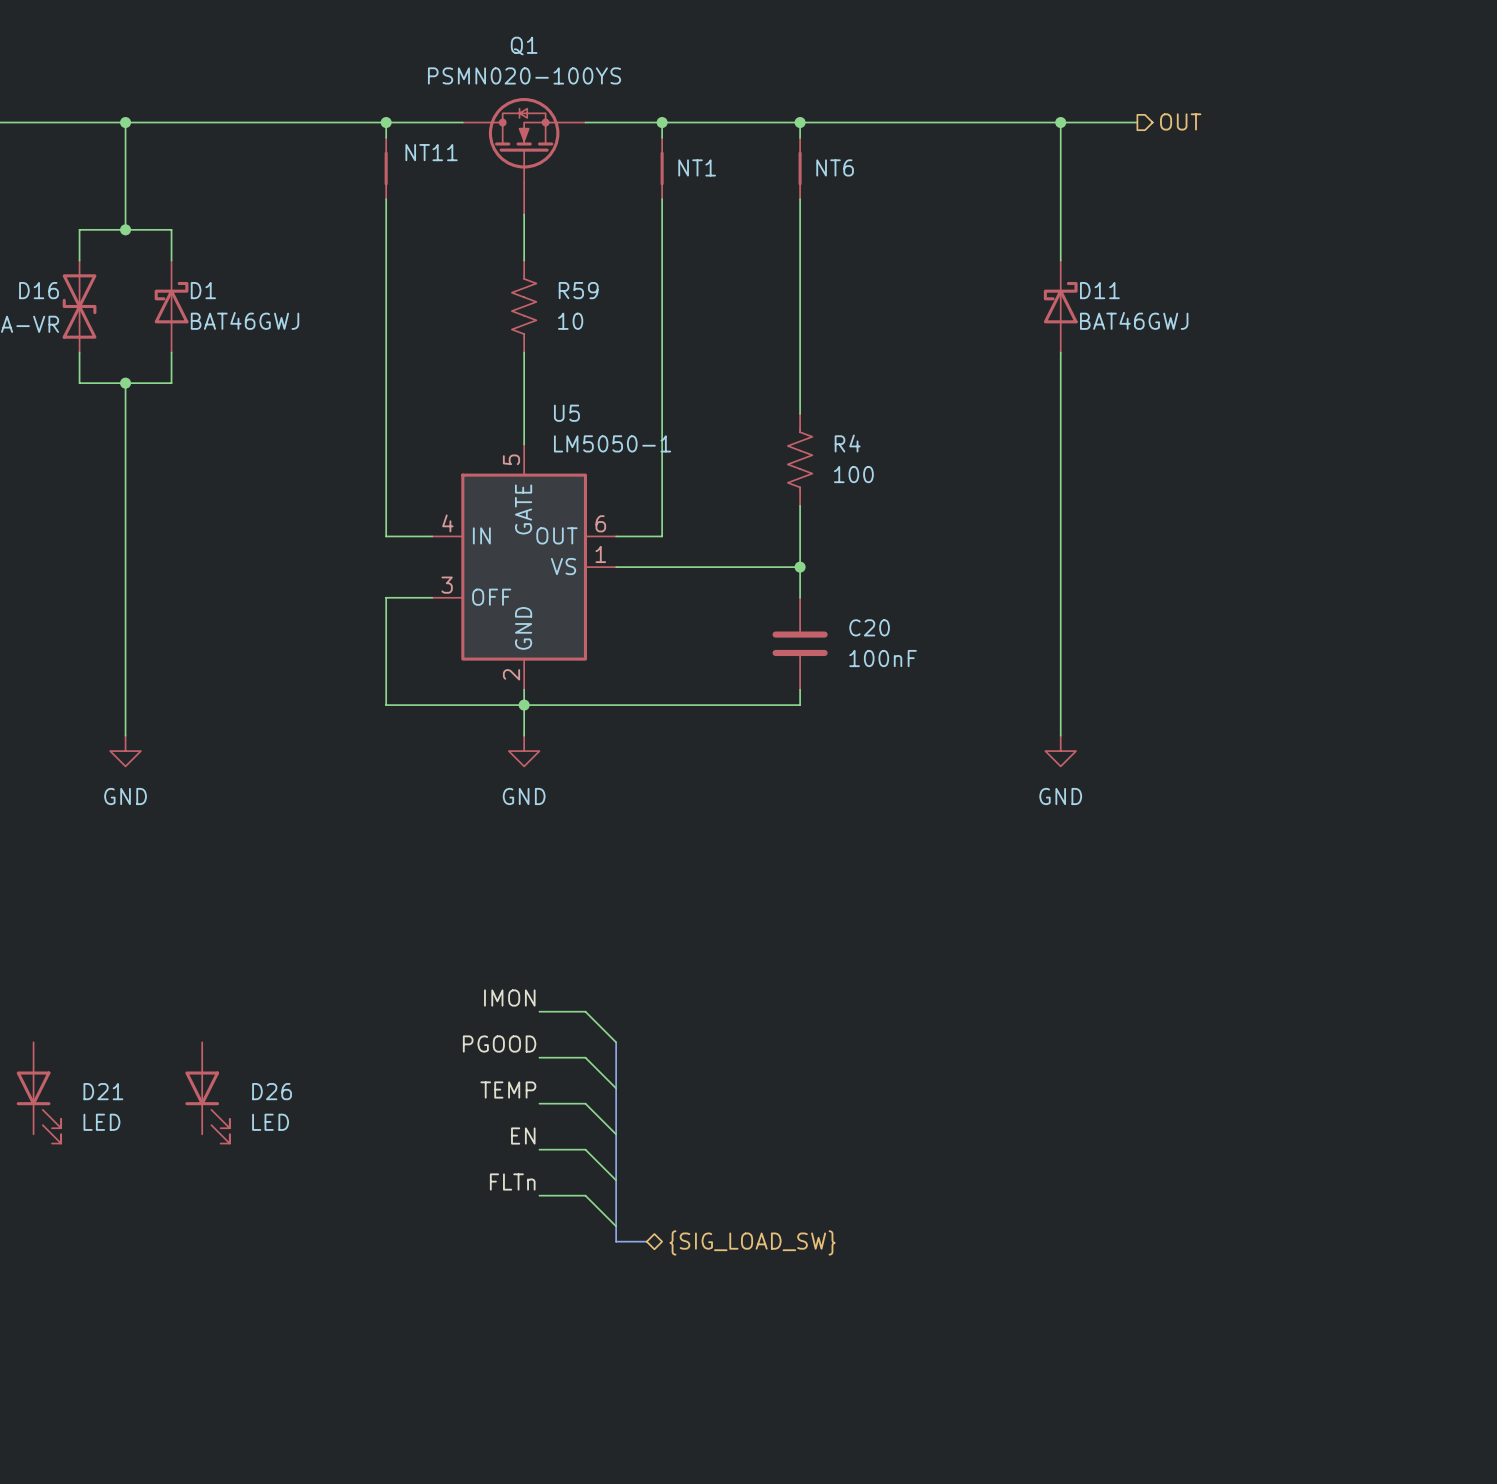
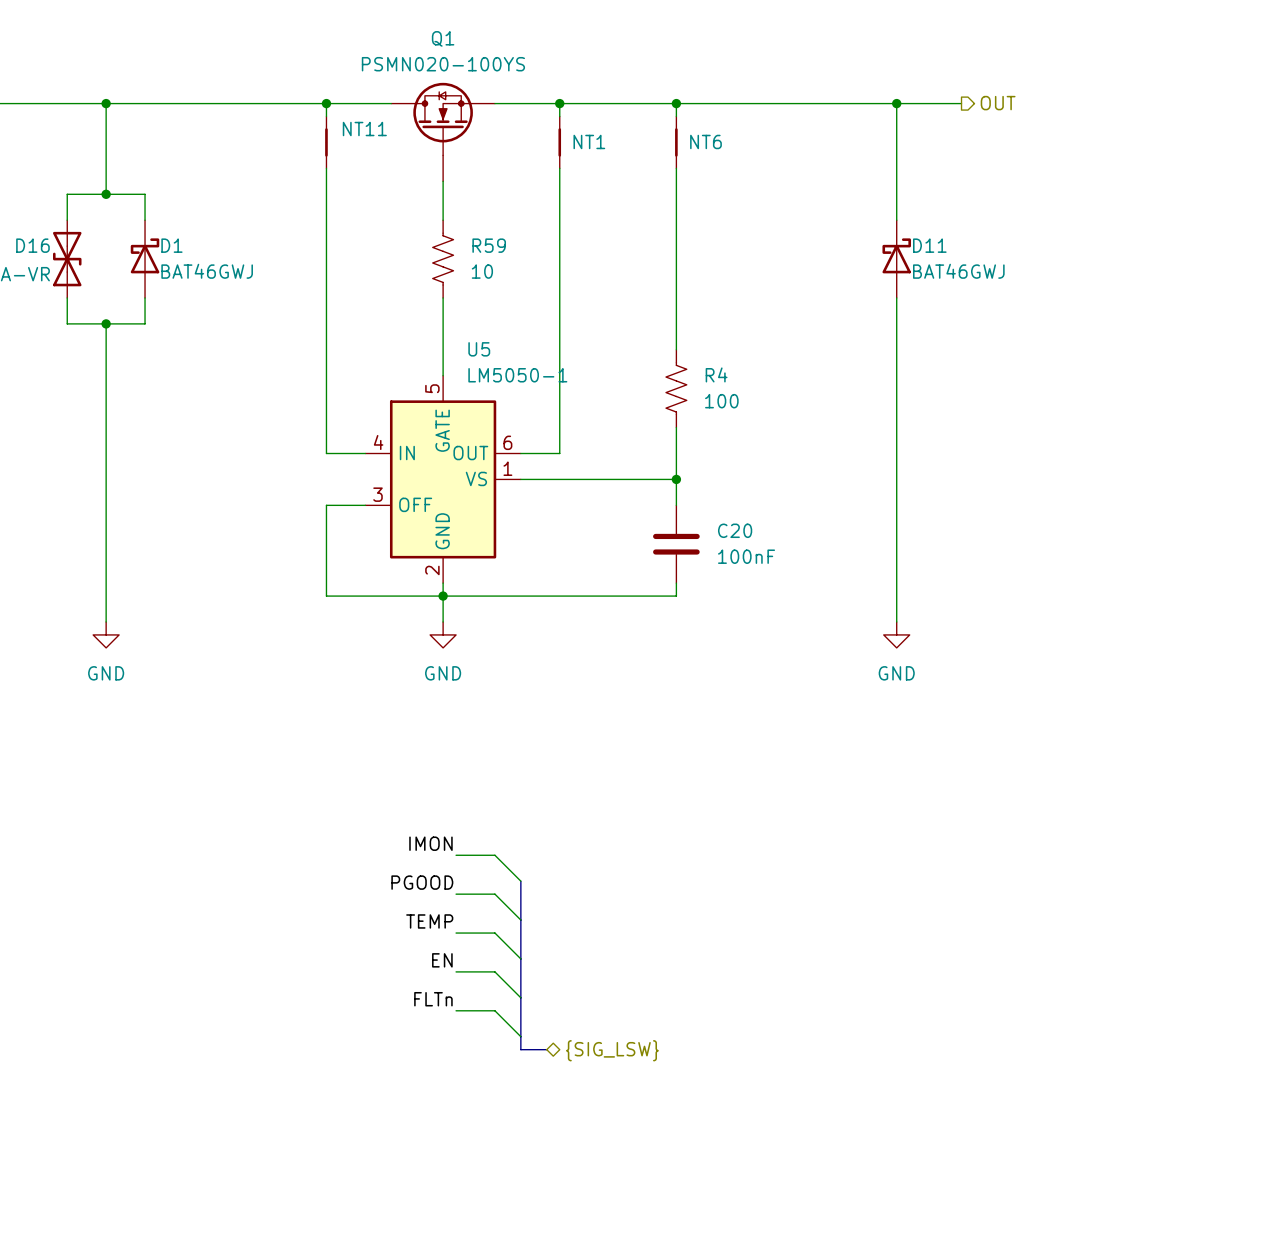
D21: LED (38, 1092) -> none
D26: LED (207, 1092) -> none
hierarchical label: {SIG_LOAD_SW} (752, 1242) -> {SIG_LSW} (612, 1050)

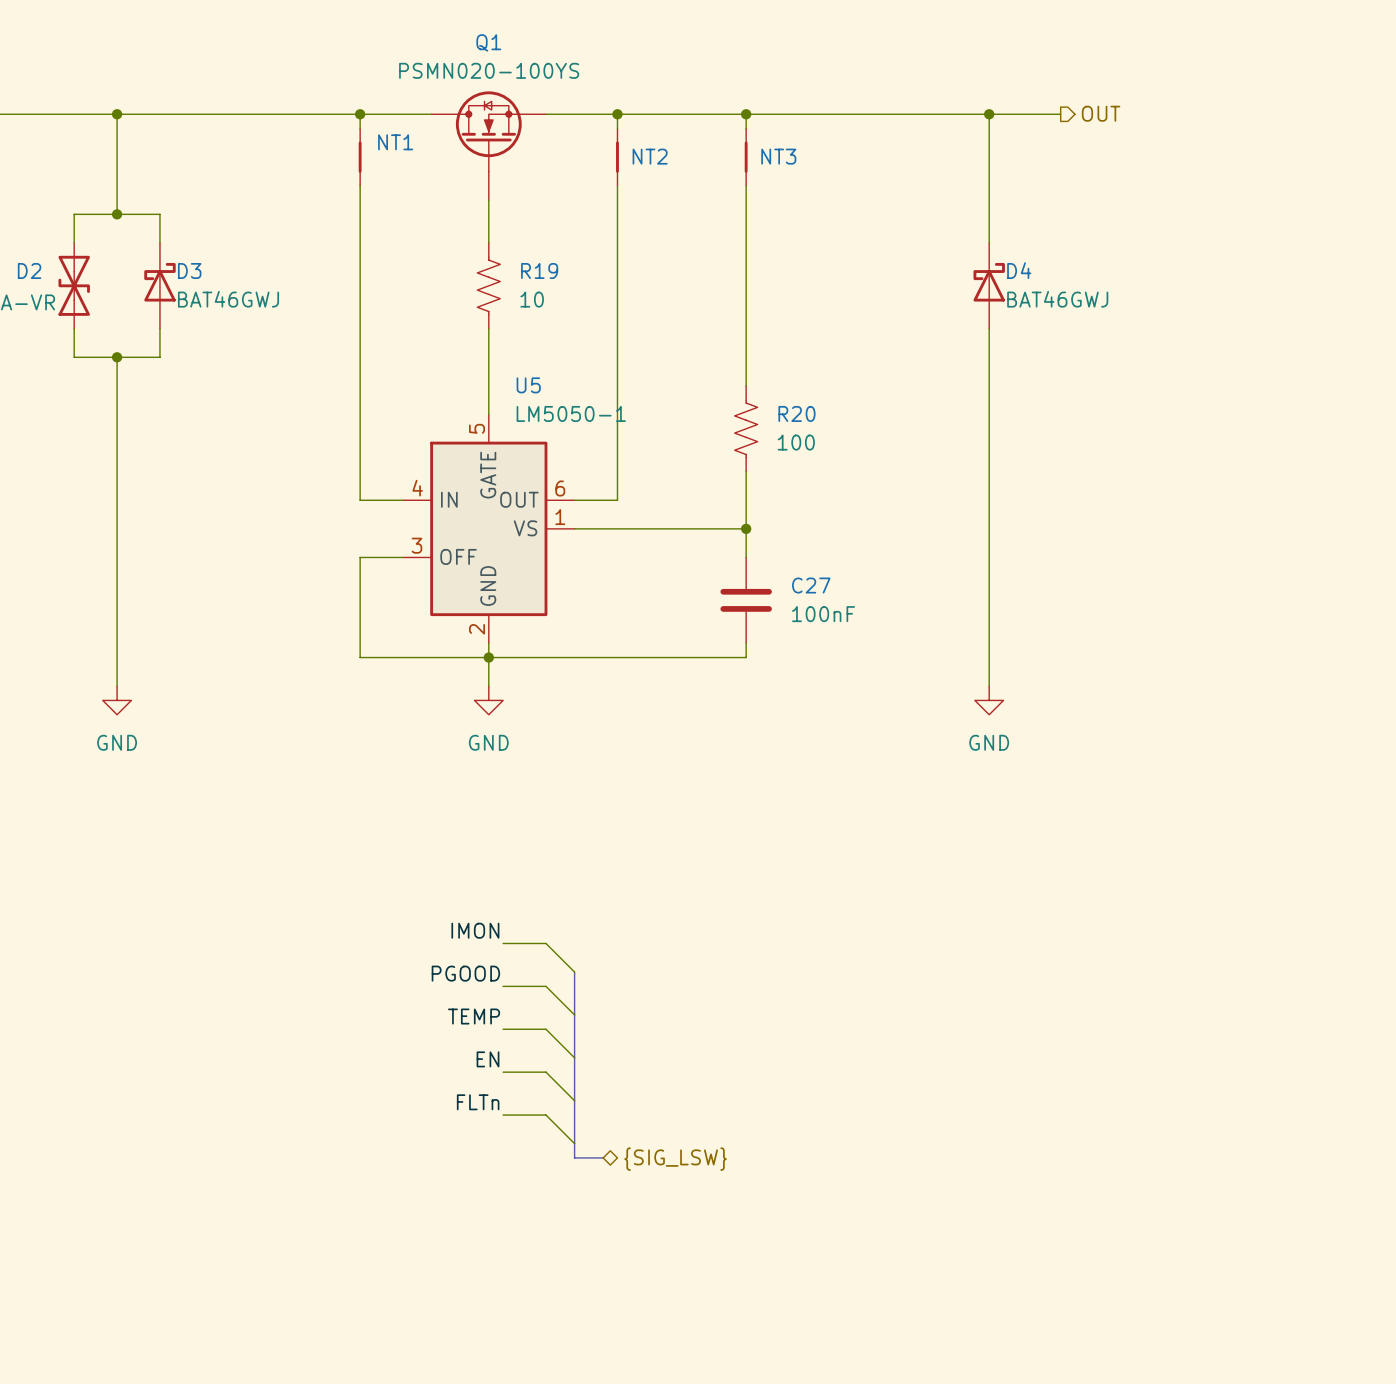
NT11 name: NT11 (364, 129) -> NT1 (395, 142)
NT1 name: NT1 (589, 141) -> NT2 (650, 156)
NT6 name: NT6 (705, 141) -> NT3 (778, 156)
D16 name: D16 (32, 245) -> D2 (29, 270)
D1 name: D1 (171, 245) -> D3 (189, 270)
R59 name: R59 (489, 245) -> R19 (539, 270)
D11 name: D11 (929, 245) -> D4 (1019, 270)
R4 name: R4 (716, 374) -> R20 (796, 413)
C20 name: C20 (735, 530) -> C27 (811, 585)

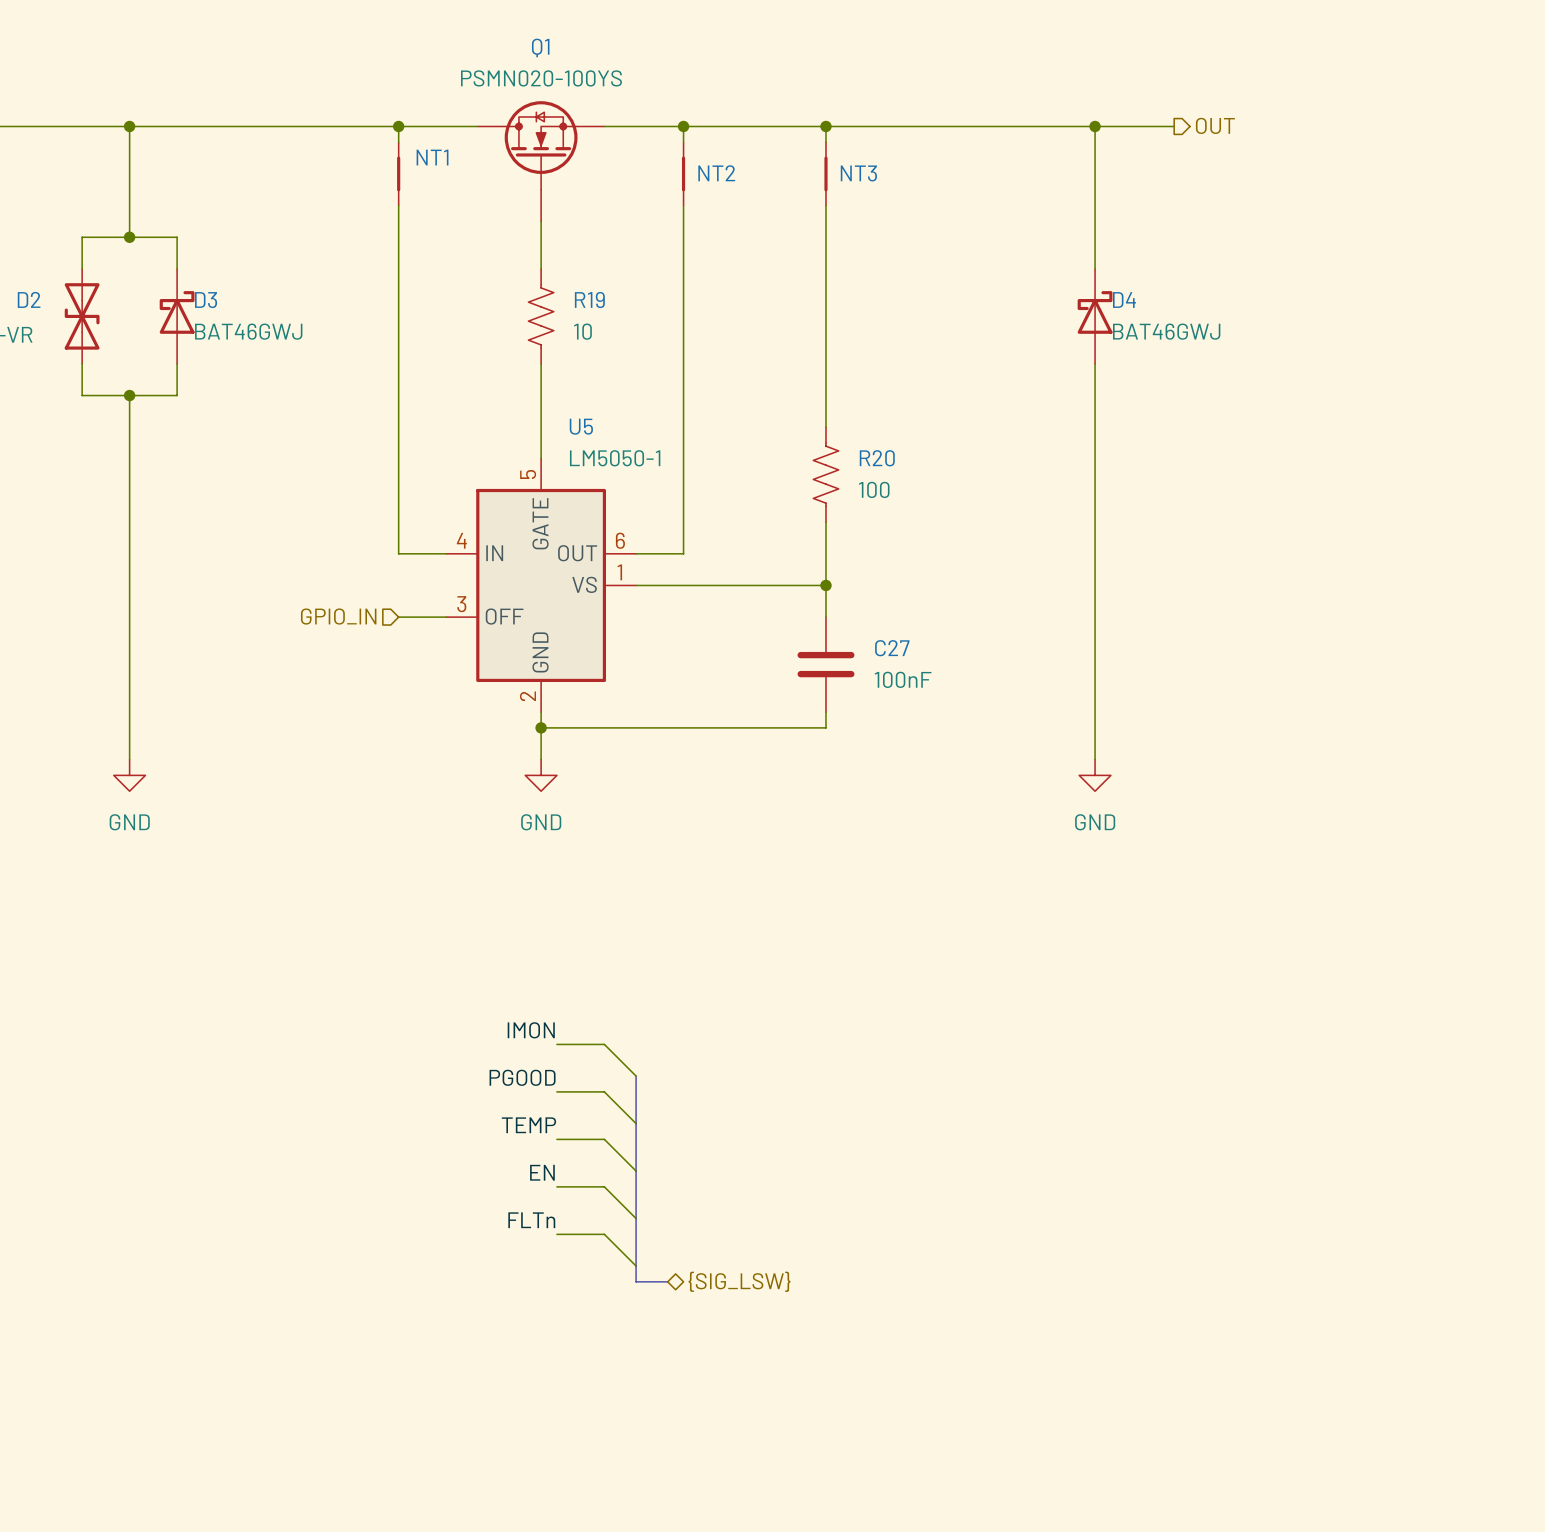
hierarchical label: none -> GPIO_IN (338, 616)
wire: (360, 557) (360, 657) (488, 657) -> none

